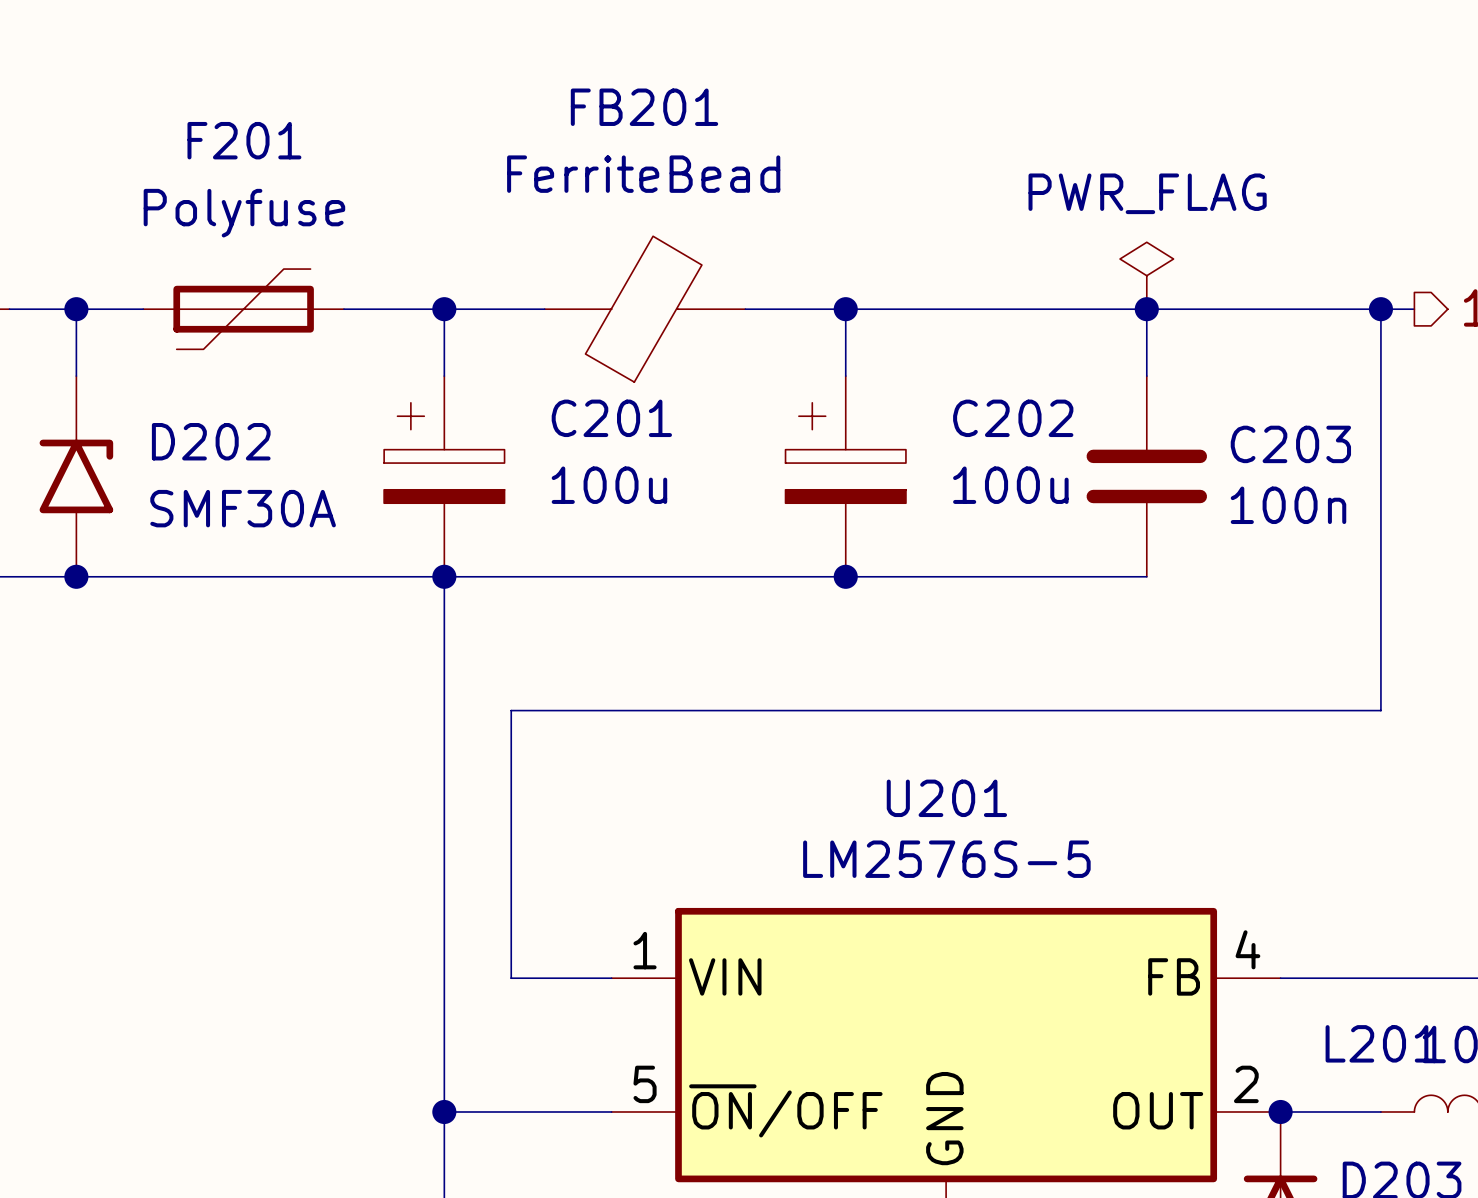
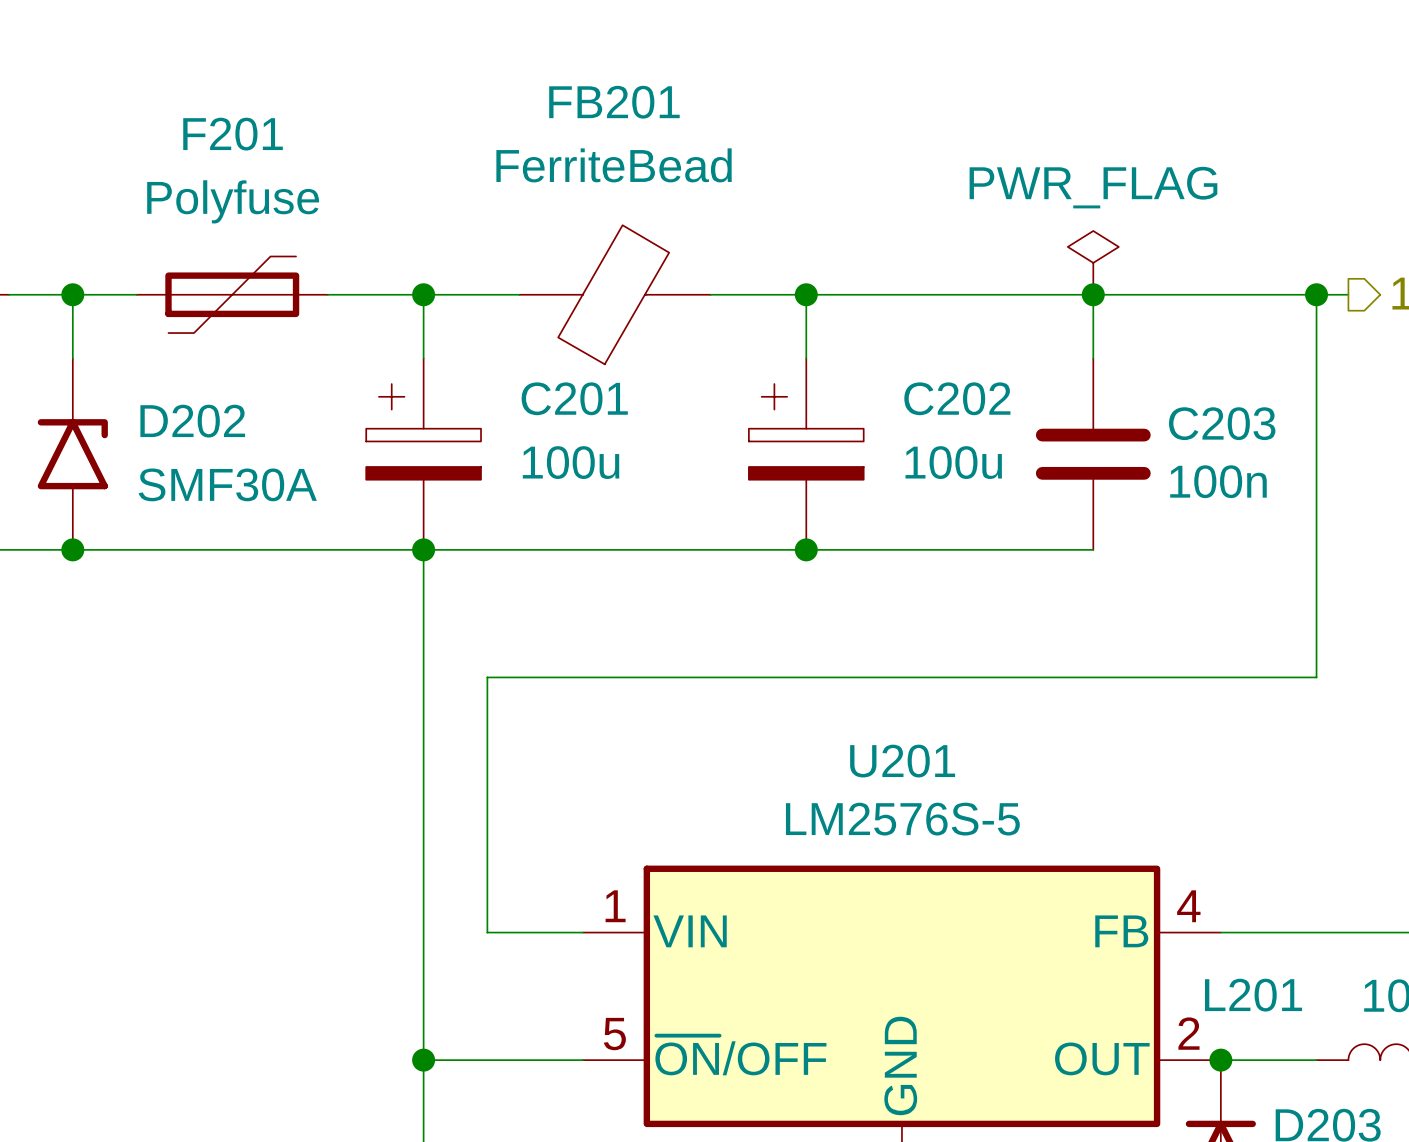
L201 name position: L201 (1381, 1043) -> L201 (1253, 995)

